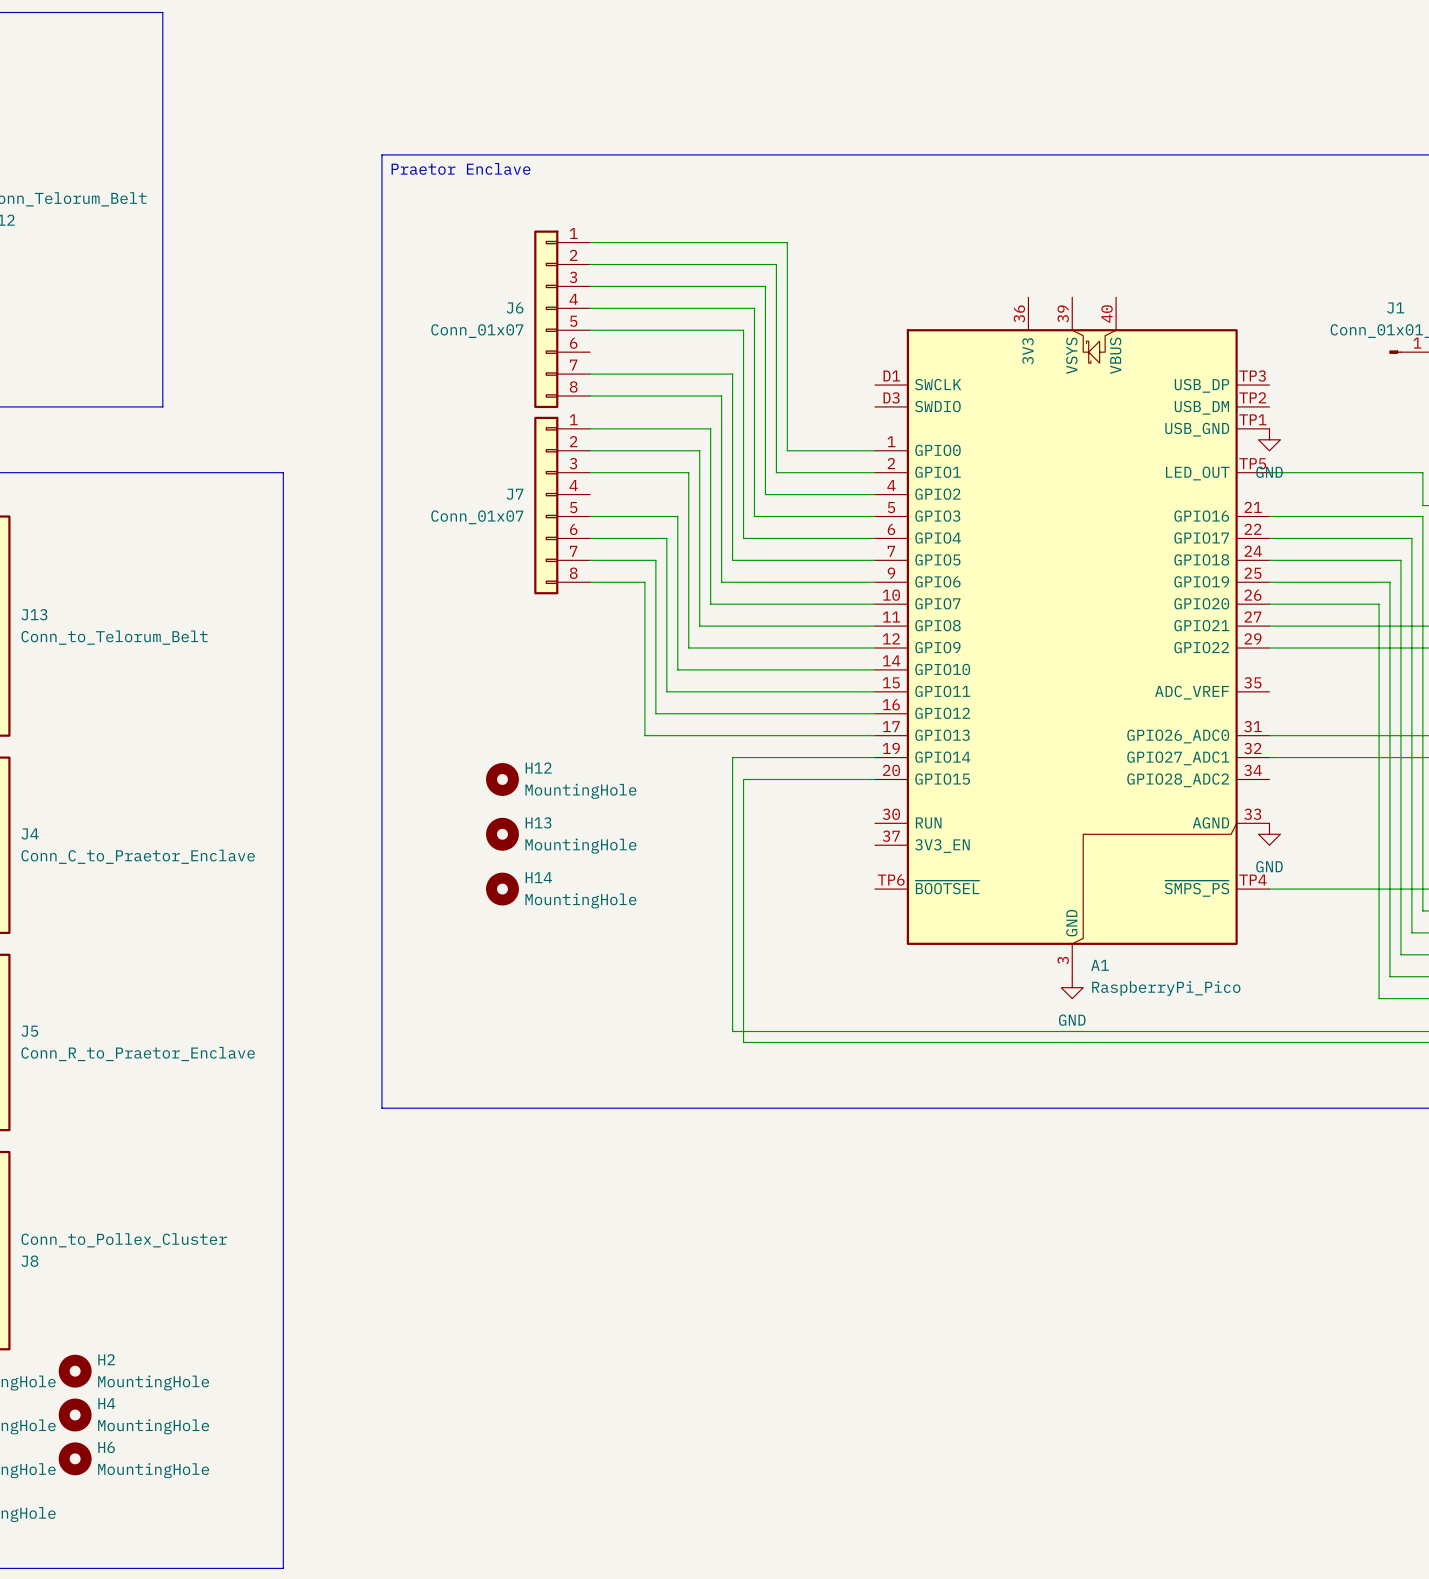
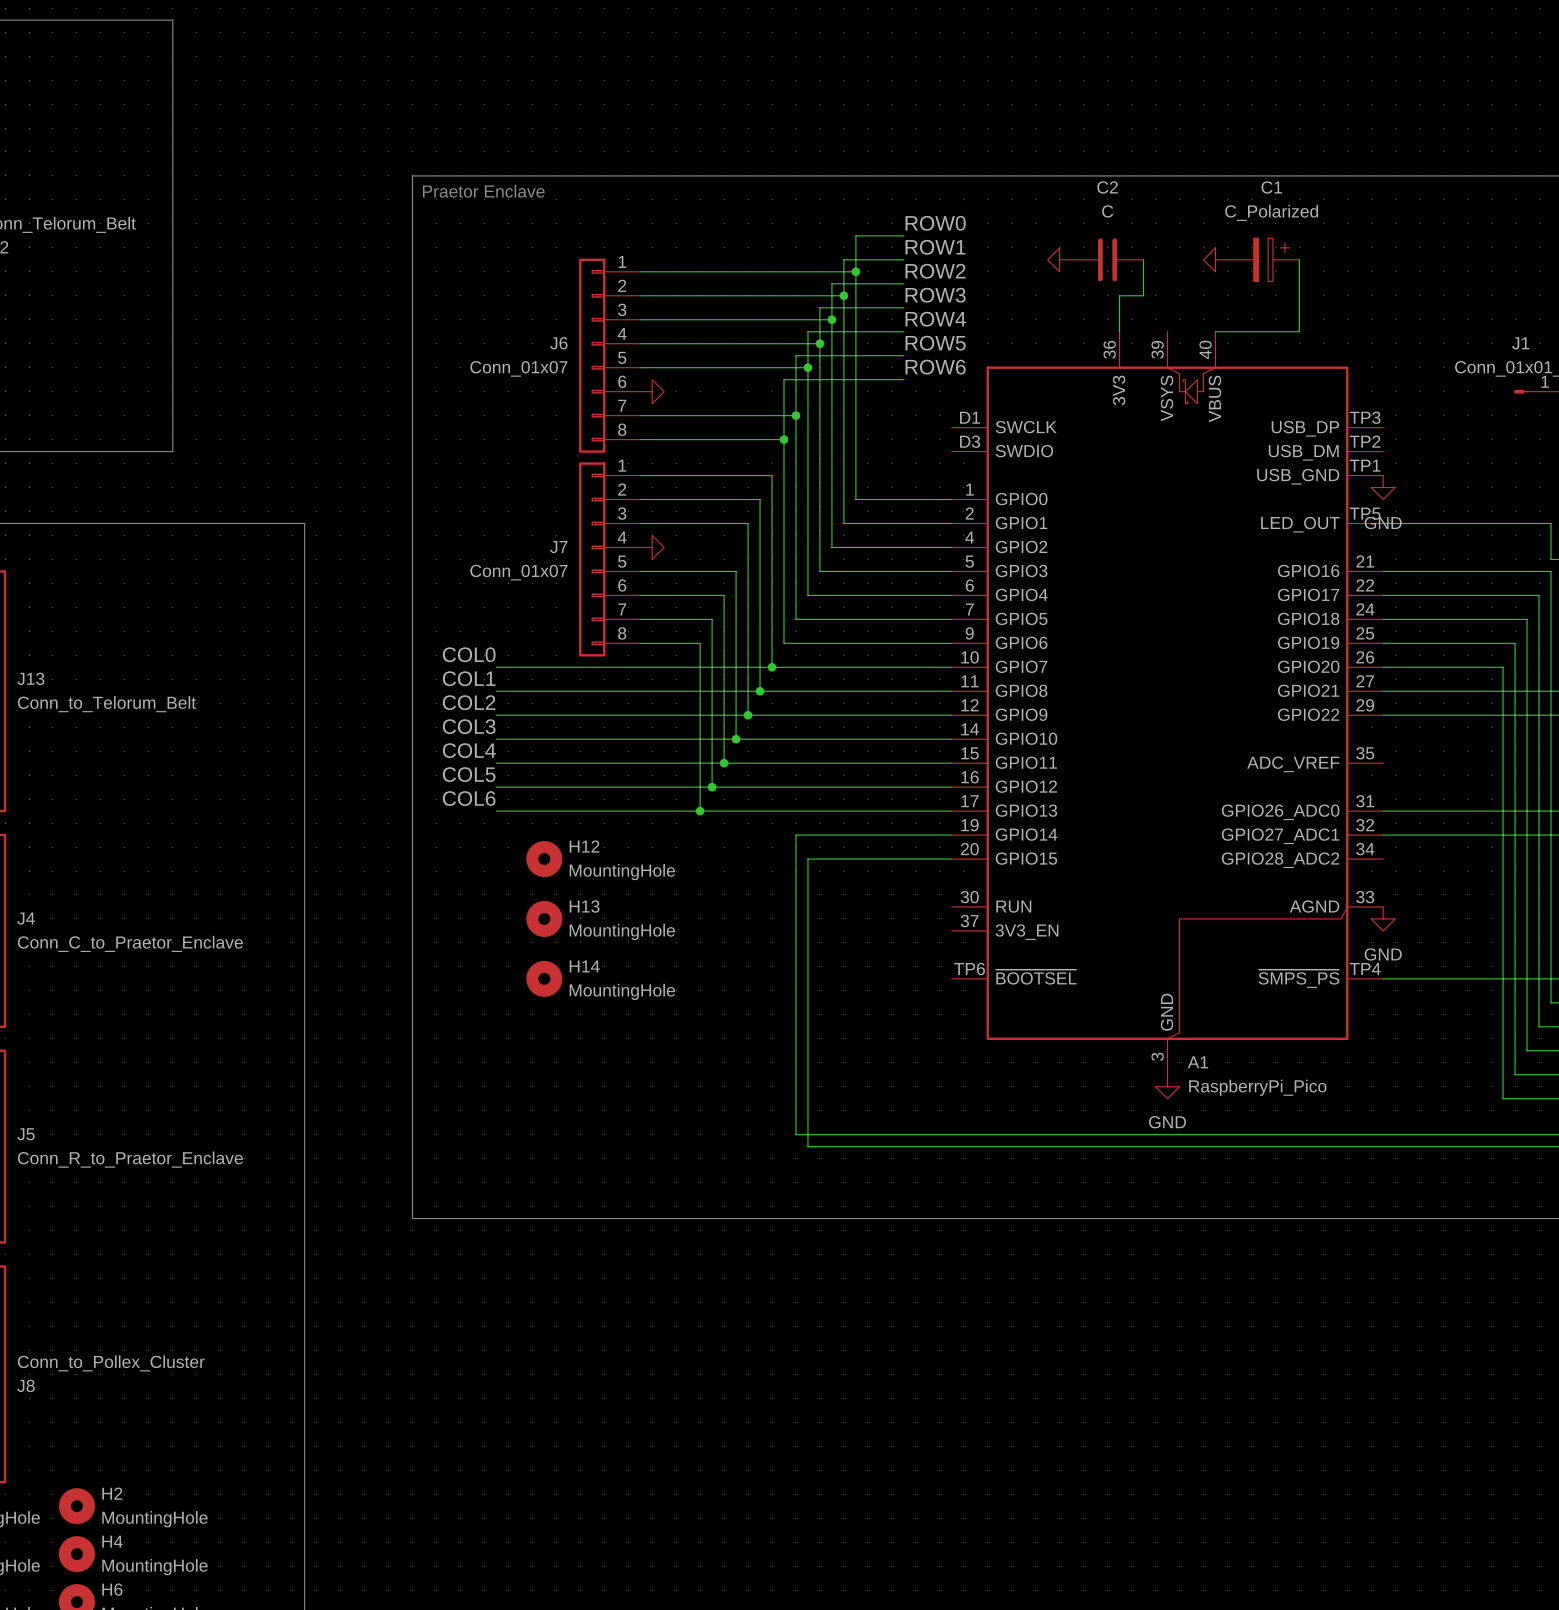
label: none -> ROW0 (935, 223)
wire: none -> (903, 235) (855, 235) (855, 271)
label: none -> ROW1 (935, 247)
wire: none -> (903, 259) (843, 259) (843, 295)
power symbol: none -> (1059, 259)
C2: none -> C (1107, 259)
wire: none -> (1143, 259) (1143, 295) (1119, 295) (1119, 331)
power symbol: none -> (1215, 259)
C1: none -> C_Polarized (1263, 259)
wire: none -> (1299, 259) (1299, 331) (1215, 331)
junction: none -> (855, 271)
label: none -> ROW2 (935, 271)
wire: none -> (903, 283) (831, 283) (831, 319)
label: none -> ROW3 (935, 295)
junction: none -> (843, 295)
wire: none -> (903, 307) (819, 307) (819, 343)
label: none -> ROW4 (935, 319)
junction: none -> (831, 319)
wire: none -> (903, 331) (807, 331) (807, 367)
label: none -> ROW5 (935, 343)
junction: none -> (819, 343)
wire: none -> (903, 355) (795, 355) (795, 415)
label: none -> ROW6 (935, 367)
junction: none -> (807, 367)
wire: none -> (903, 379) (784, 379) (784, 439)
power symbol: none -> (652, 391)
junction: none -> (795, 415)
junction: none -> (784, 439)
power symbol: none -> (652, 547)
label: none -> COL0 (469, 654)
wire: none -> (496, 667) (772, 667)
junction: none -> (772, 667)
label: none -> COL1 (469, 678)
wire: none -> (496, 691) (760, 691)
junction: none -> (760, 691)
label: none -> COL2 (469, 702)
wire: none -> (496, 715) (748, 715)
junction: none -> (748, 715)
label: none -> COL3 (469, 726)
wire: none -> (496, 739) (736, 739)
junction: none -> (736, 739)
label: none -> COL4 (469, 750)
wire: none -> (496, 763) (724, 763)
junction: none -> (724, 763)
label: none -> COL5 (469, 774)
wire: none -> (496, 787) (712, 787)
junction: none -> (712, 787)
label: none -> COL6 (469, 798)
wire: none -> (496, 811) (700, 811)
junction: none -> (700, 811)

